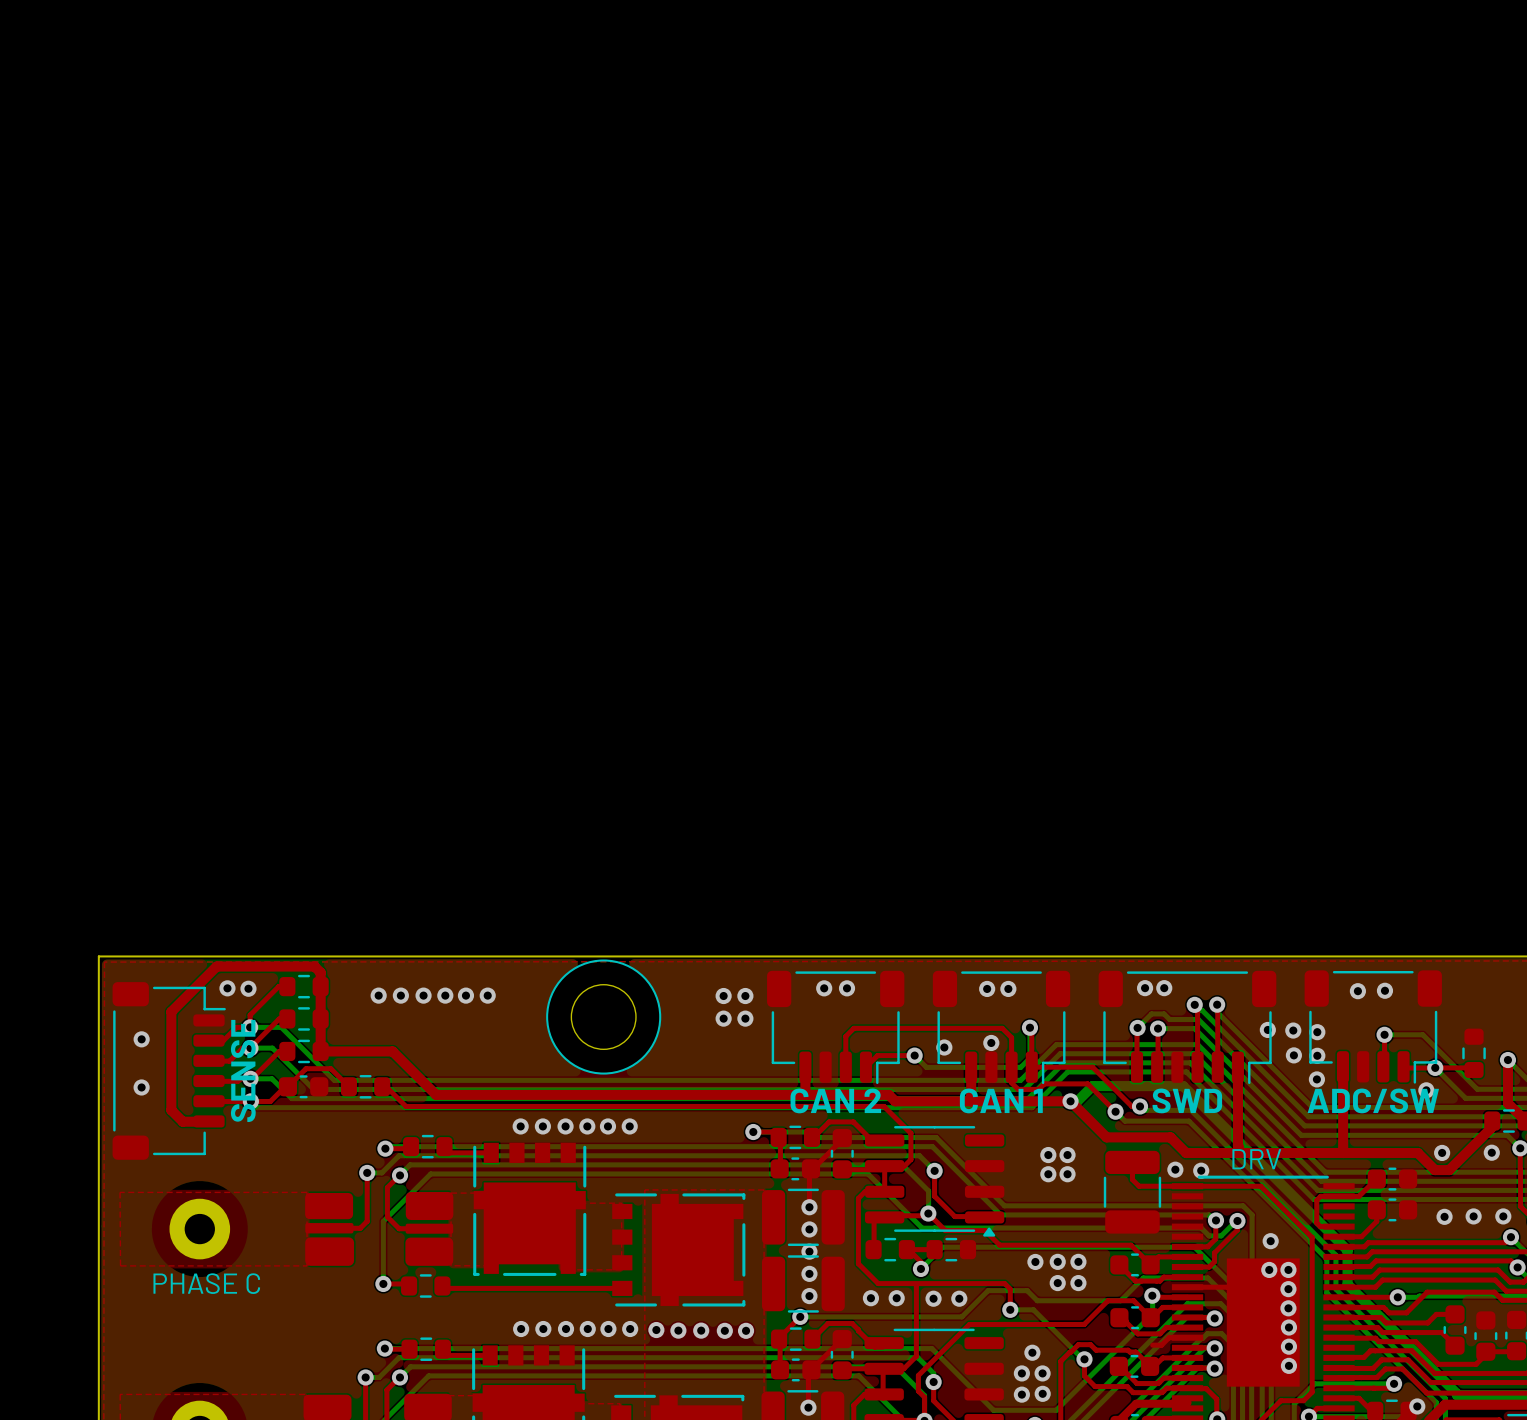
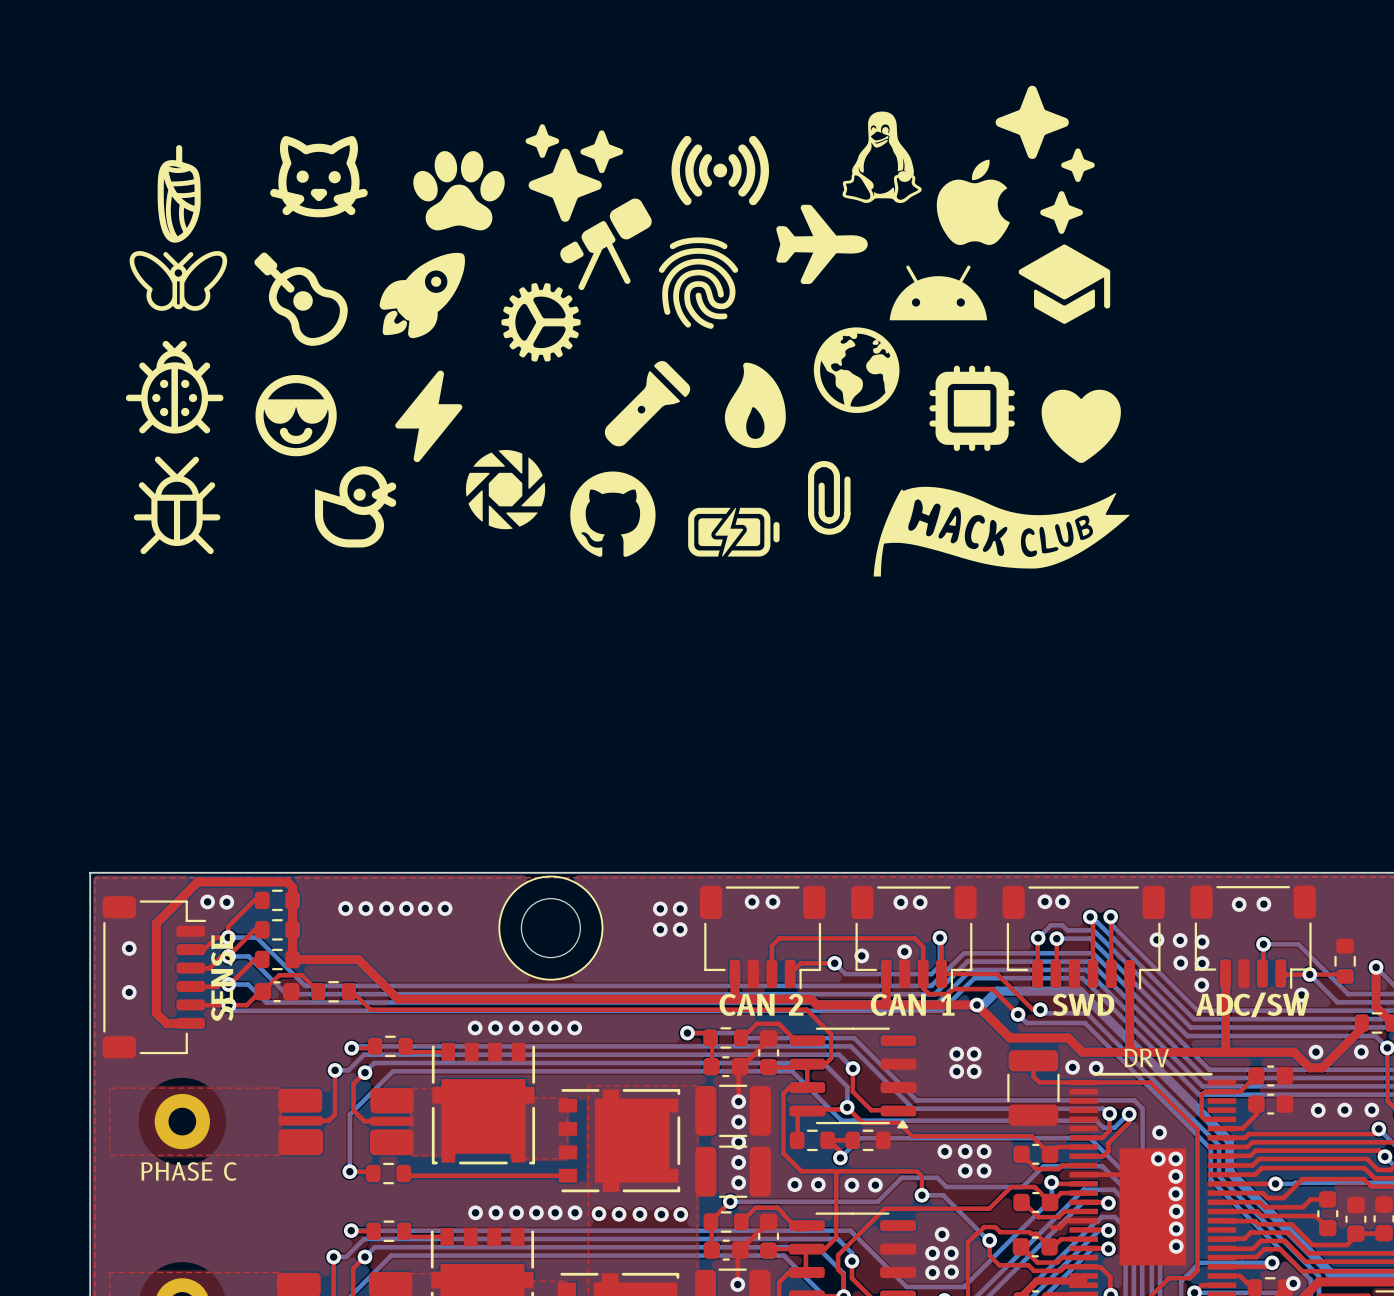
drawing: none -> [501, 85, 1111, 414]
drawing: none -> [270, 136, 368, 218]
drawing: none -> [129, 145, 228, 311]
drawing: none -> [413, 151, 505, 231]
drawing: none -> [254, 252, 348, 346]
drawing: none -> [379, 252, 465, 339]
drawing: none -> [125, 340, 224, 434]
drawing: none -> [604, 361, 691, 447]
drawing: none -> [724, 362, 786, 449]
drawing: none -> [929, 365, 1015, 451]
drawing: none -> [255, 370, 546, 548]
drawing: none -> [1041, 389, 1121, 463]
drawing: none -> [133, 456, 221, 555]
drawing: none -> [570, 471, 656, 557]
line: none -> (847, 479) (846, 518) (842, 526) (833, 531) (825, 531) (819, 528) (814, 523) (811, 515) (811, 472) (817, 465) (827, 464) (833, 468) (836, 476) (836, 513) (831, 520) (825, 519) (822, 515) (821, 485)
drawing: none -> [873, 486, 1130, 577]
drawing: none -> [688, 507, 780, 557]

